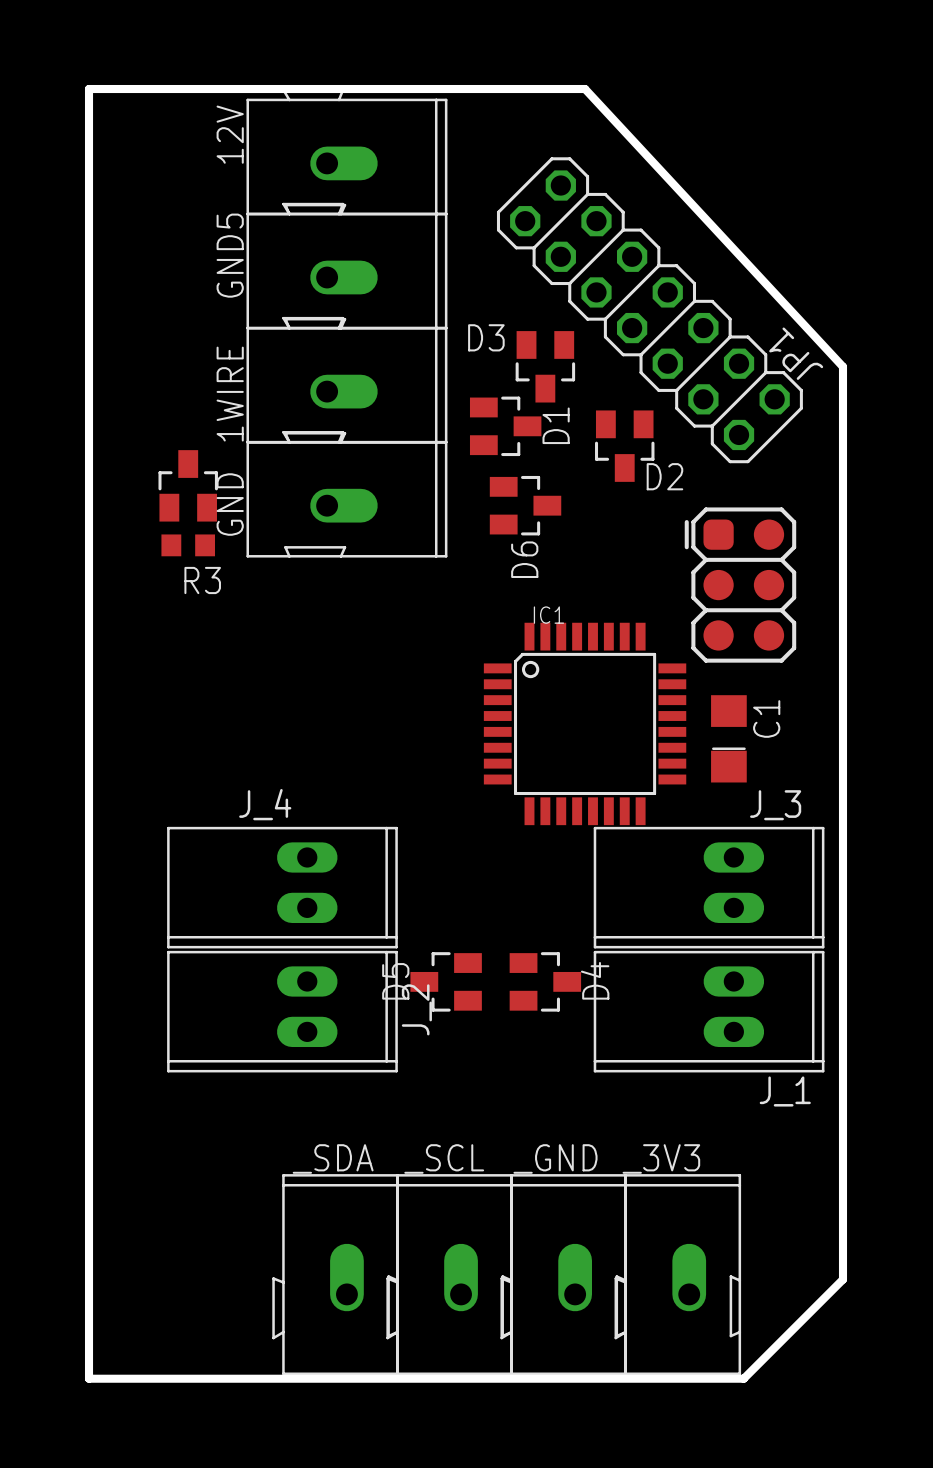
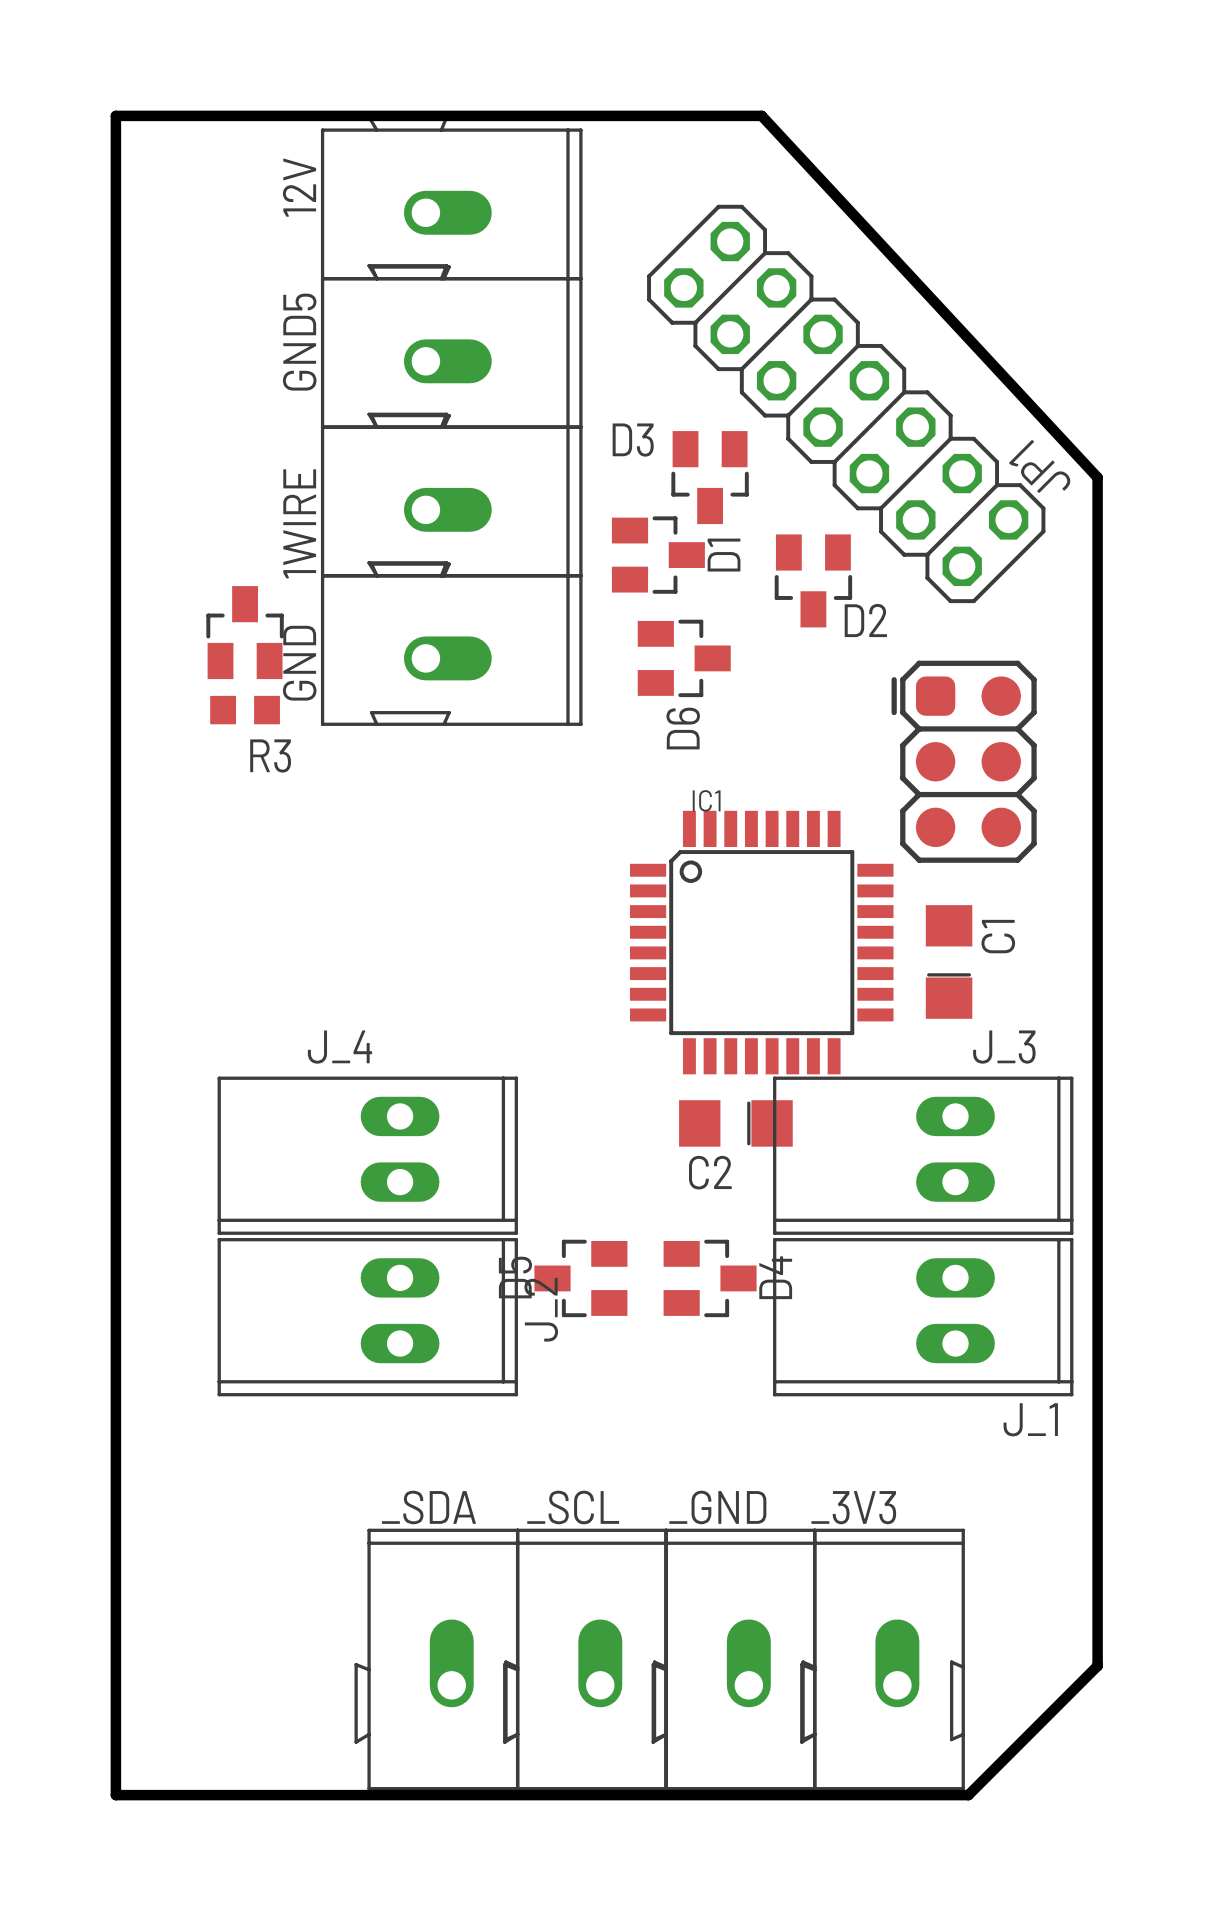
C2: none -> (735, 1123)

